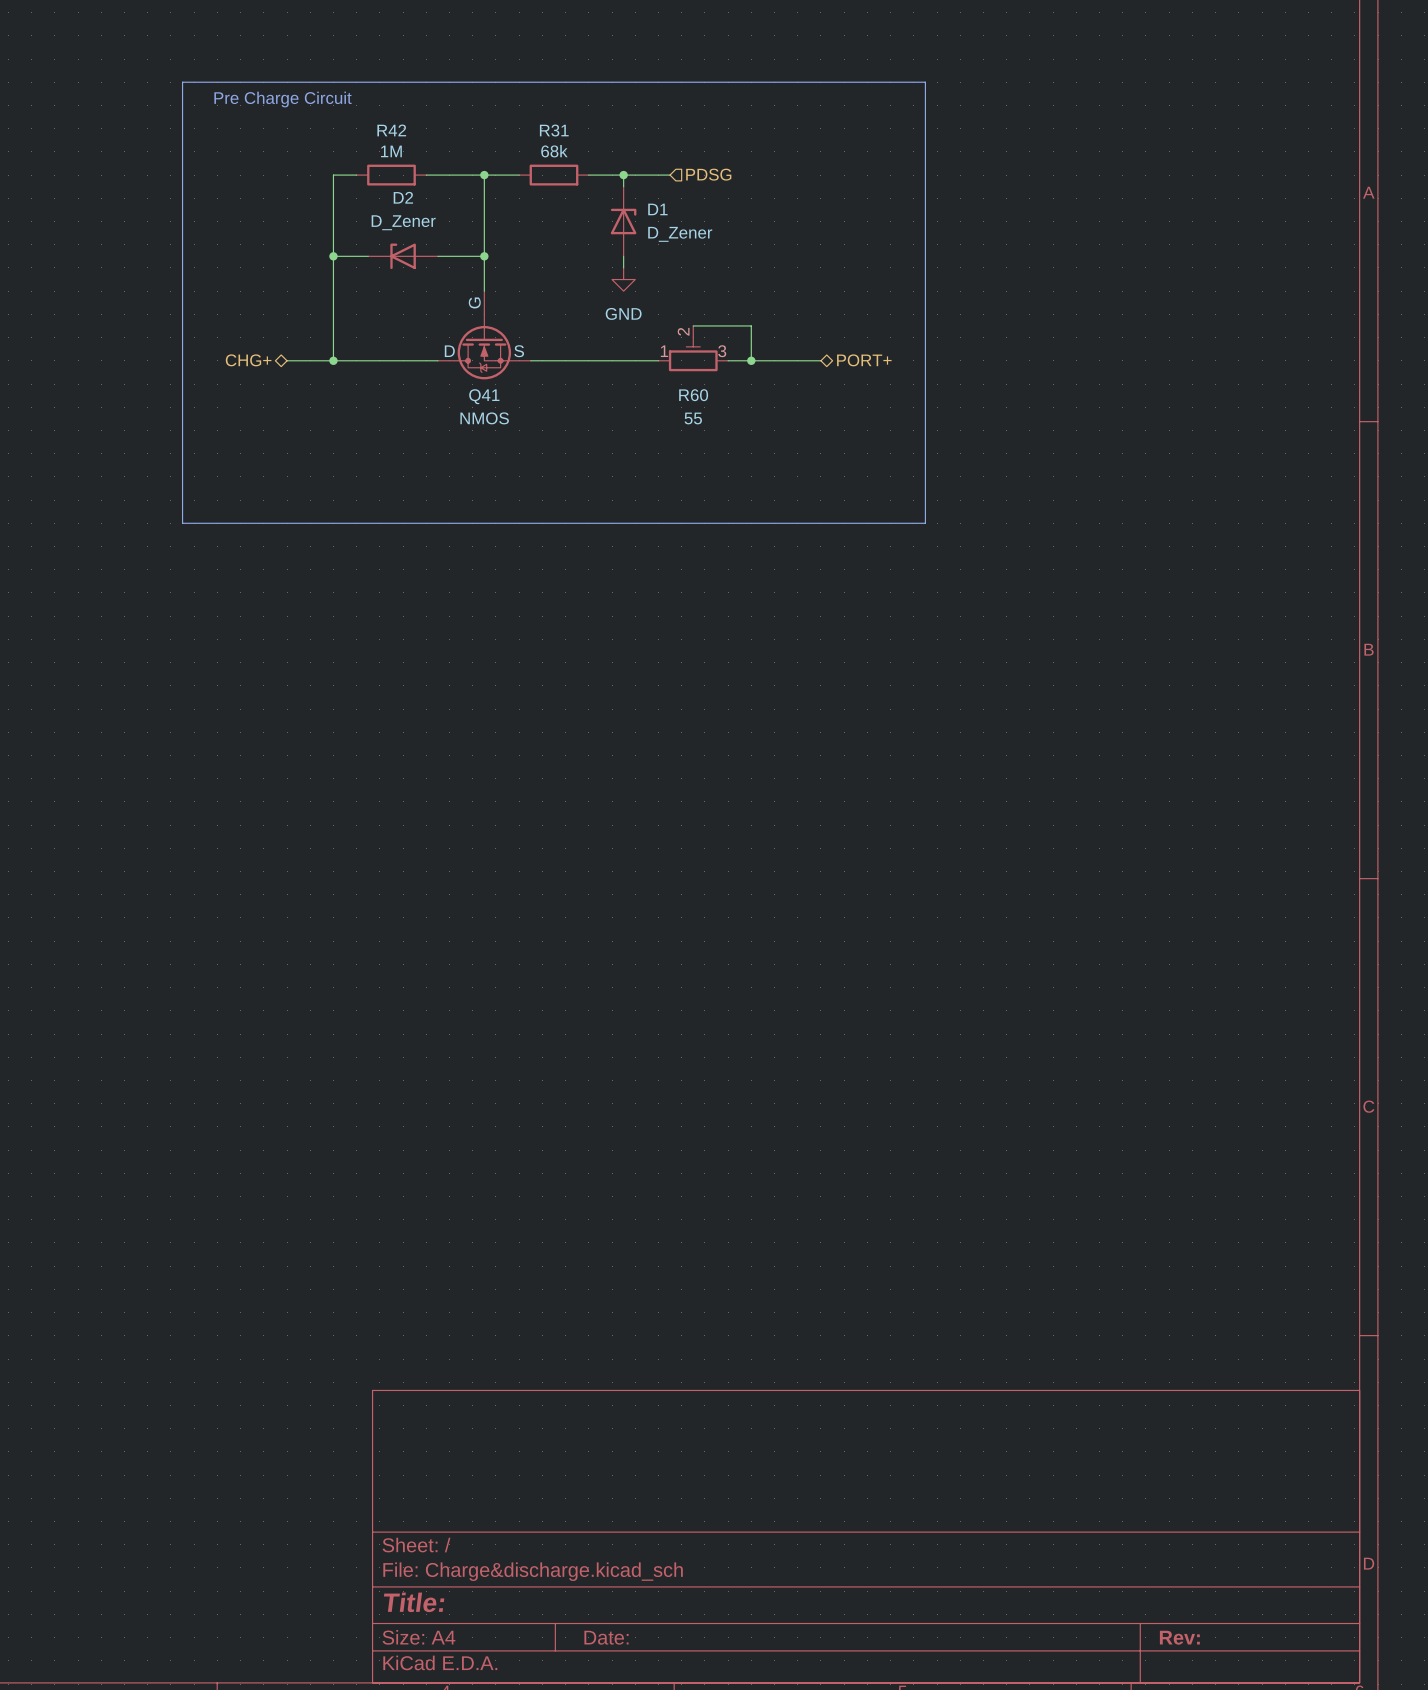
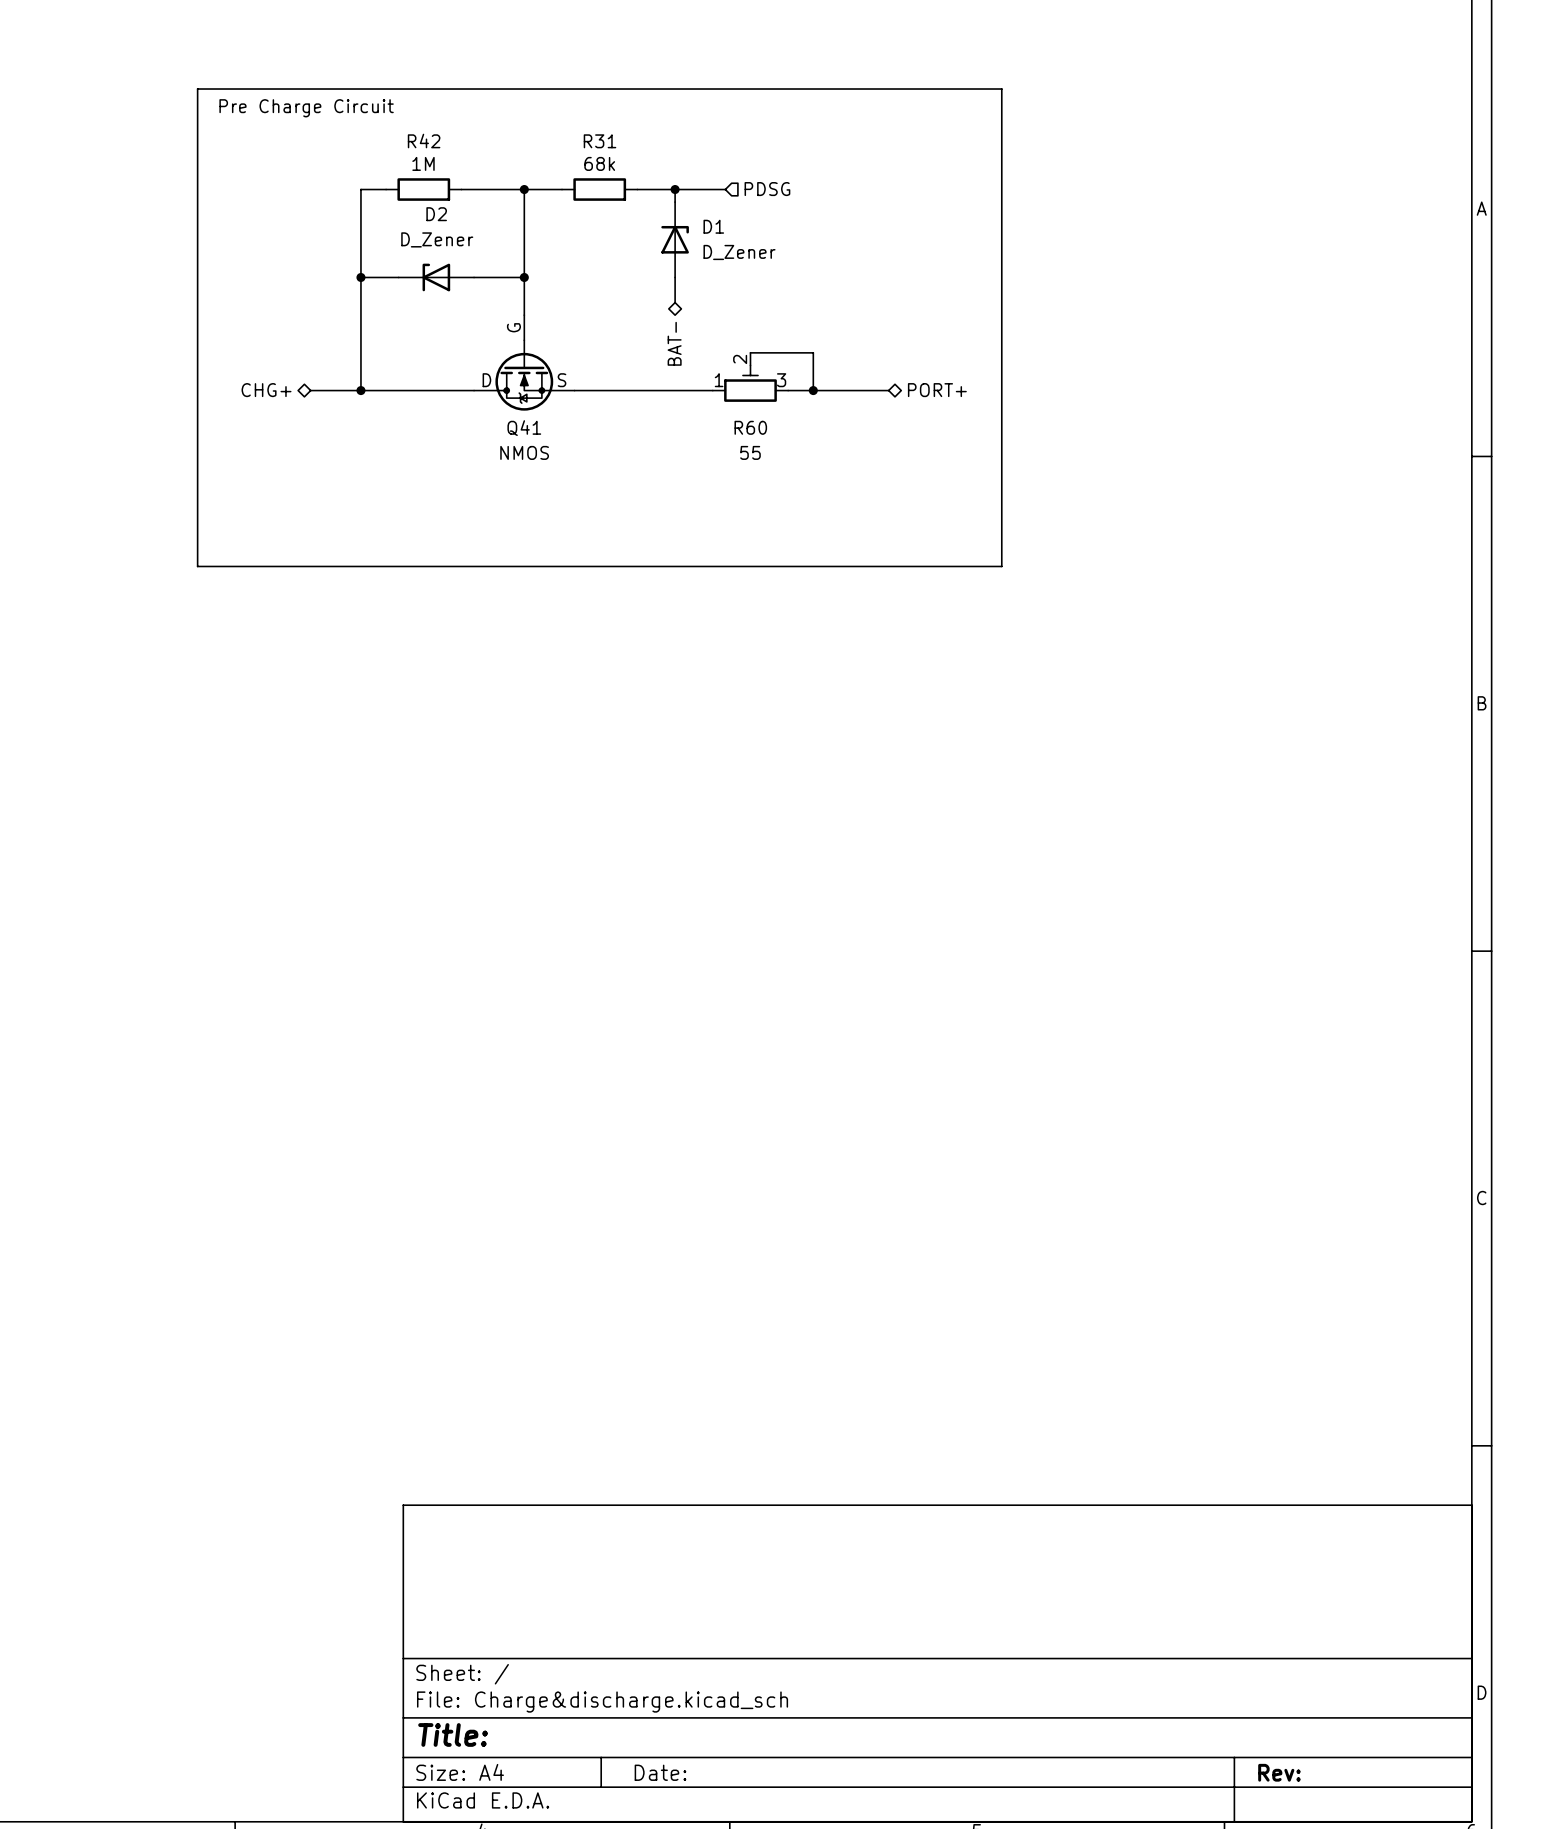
power symbol: GND (623, 279) -> none
hierarchical label: none -> BAT- (674, 343)

